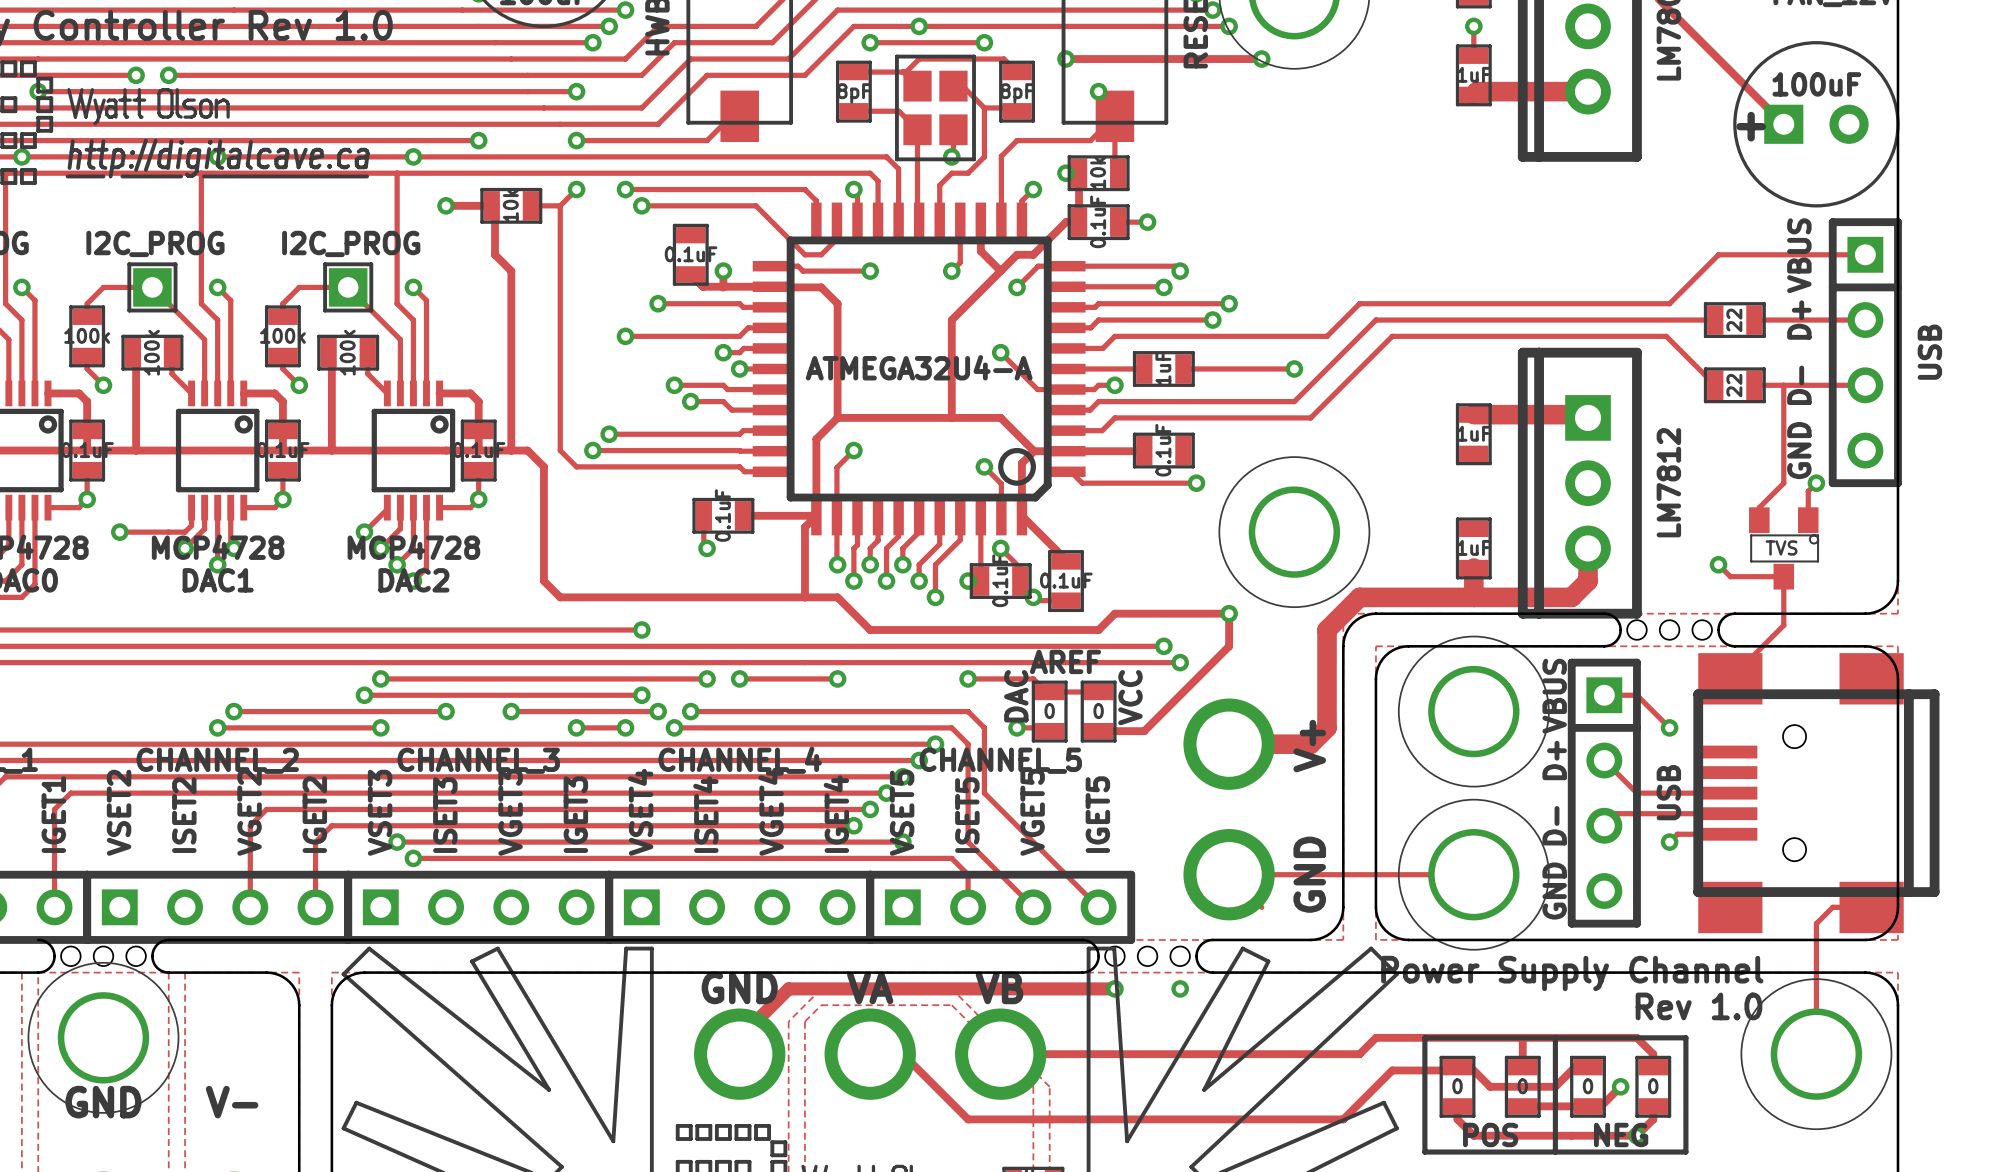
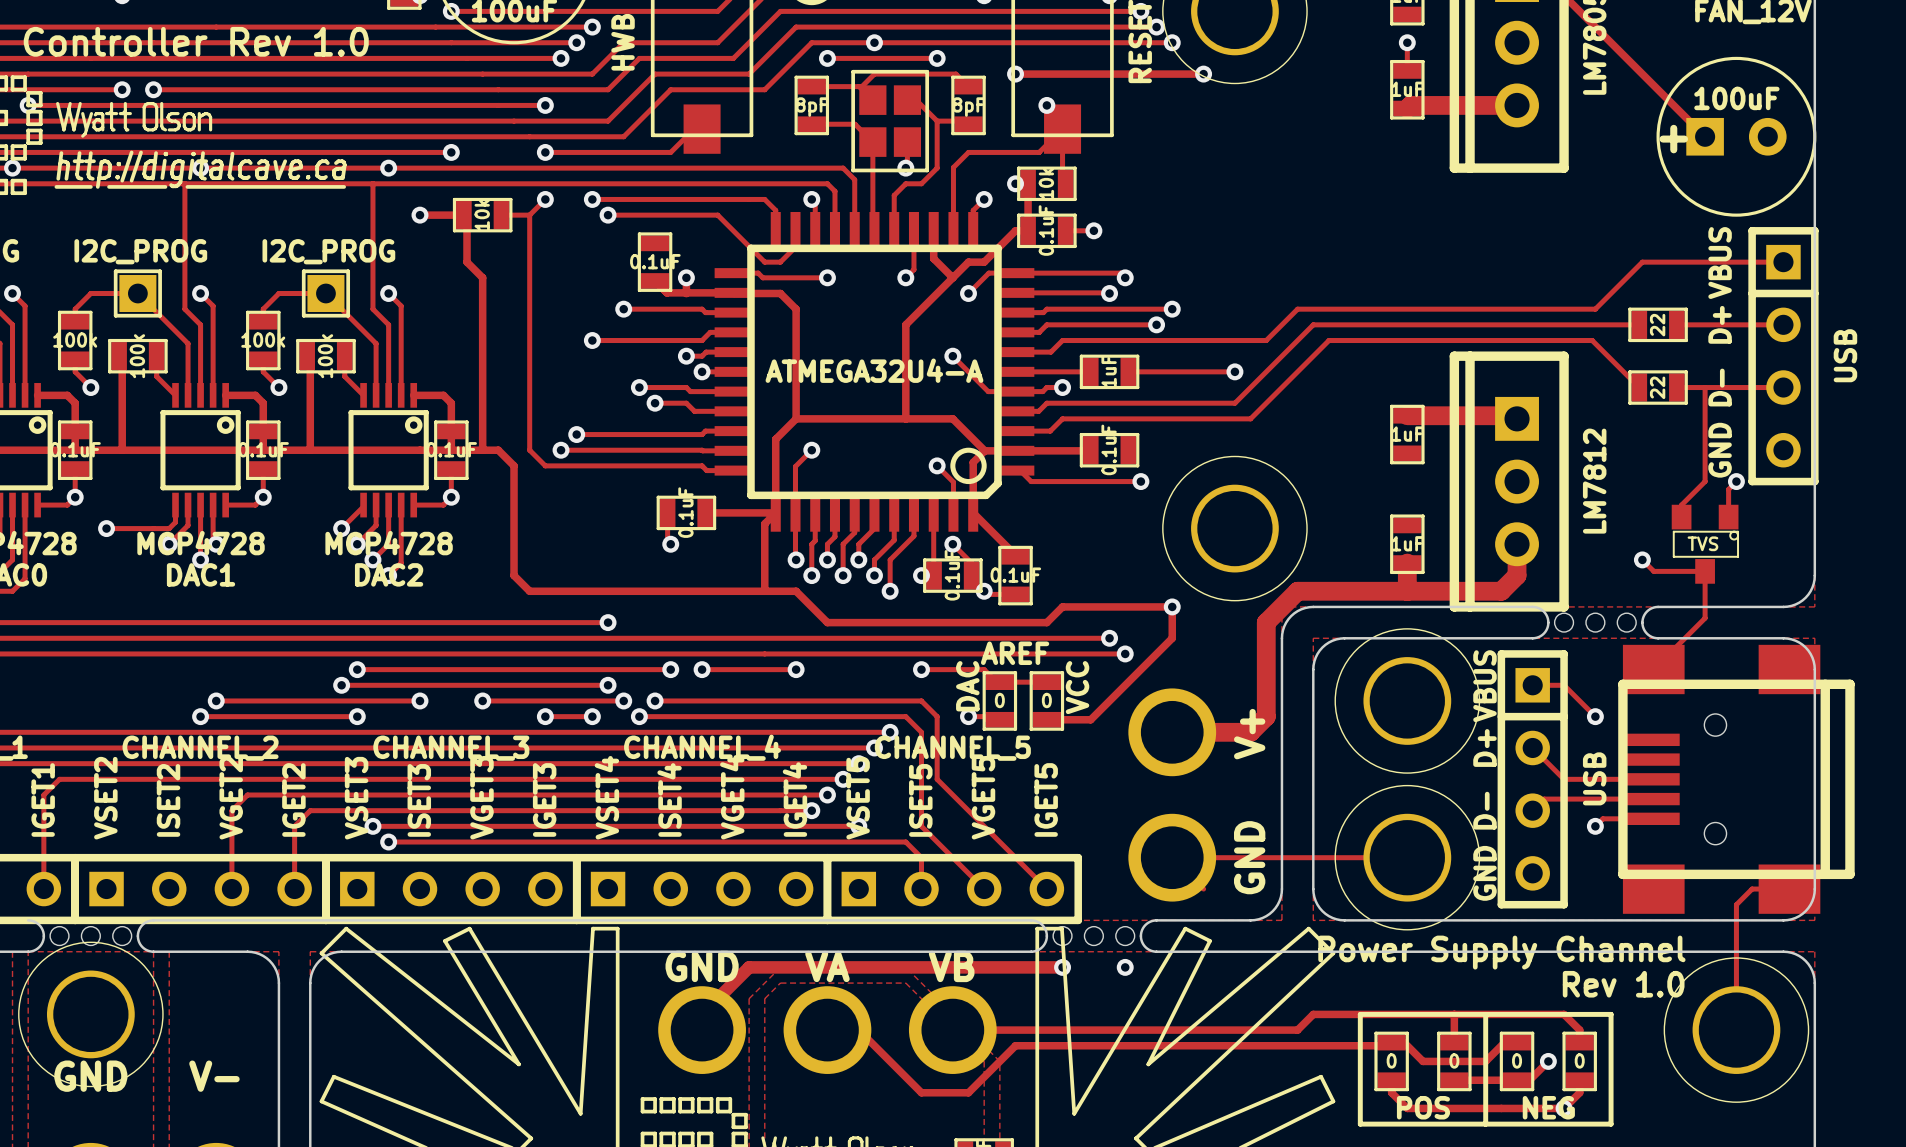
track: (1392, 1070) (1343, 1119) (1017, 1119) -> (1328, 1045) (1015, 1045) (968, 1092)

